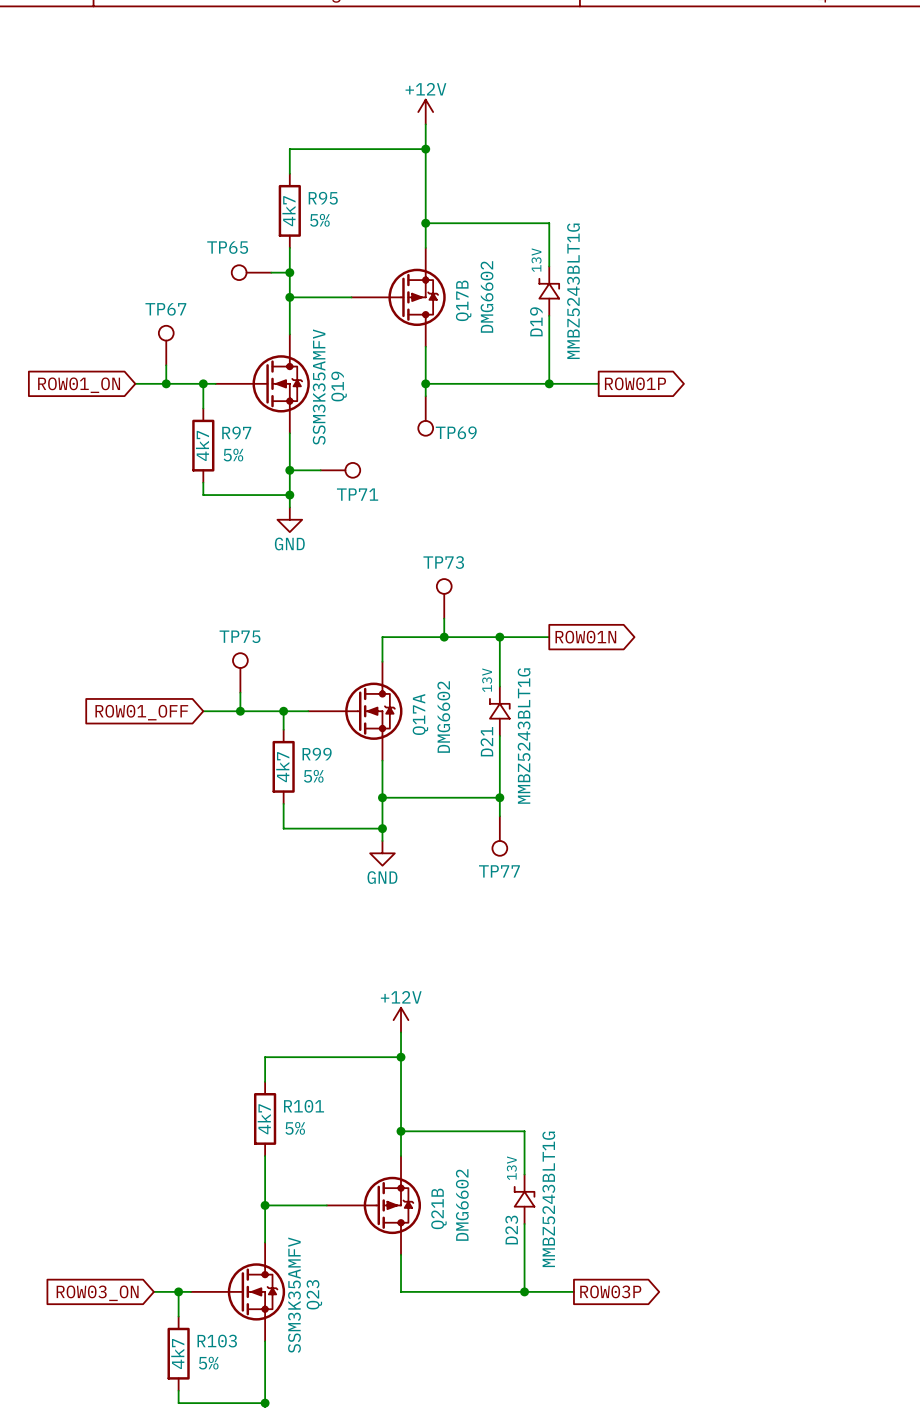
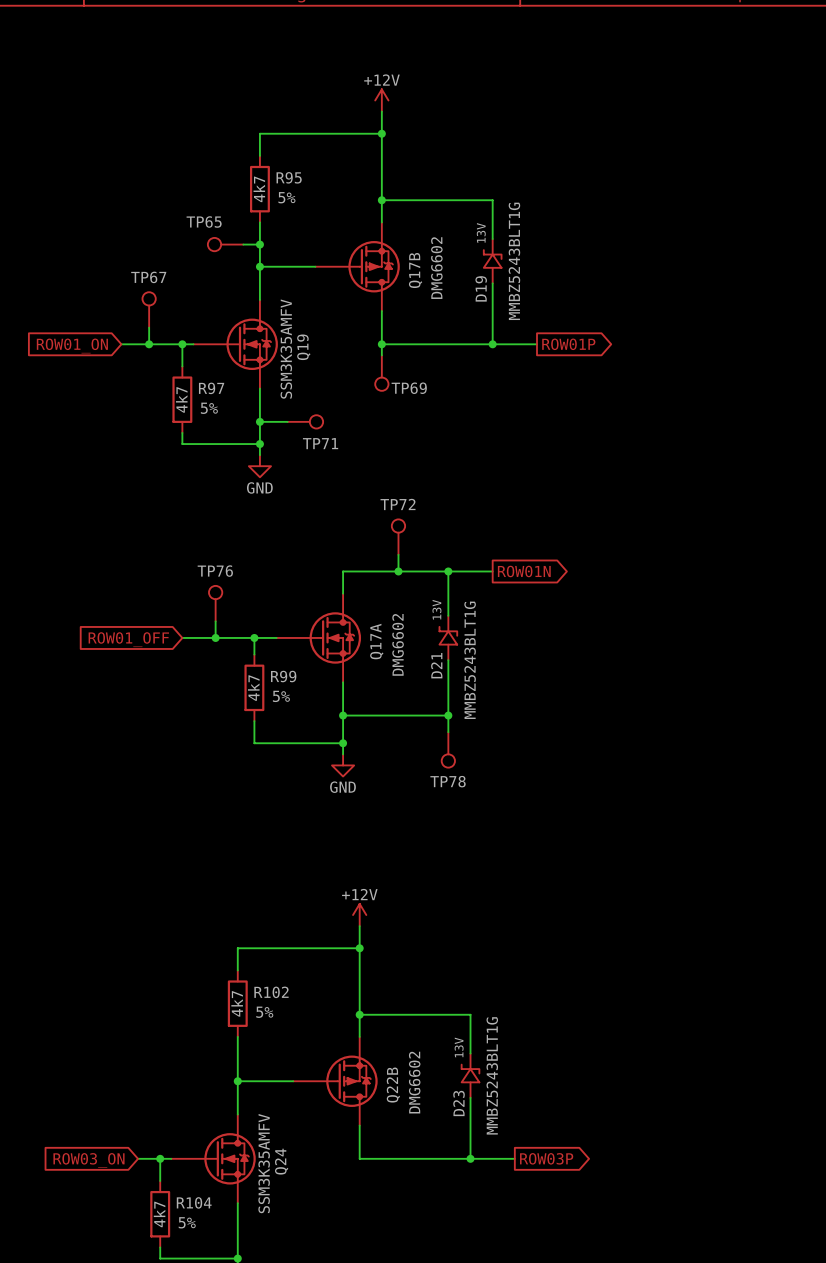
TP73 name: TP73 (443, 562) -> TP72 (398, 504)
TP75 name: TP75 (240, 636) -> TP76 (215, 571)
TP77 name: TP77 (499, 871) -> TP78 (448, 781)
R101 name: R101 (304, 1106) -> R102 (271, 992)
Q21B name: Q21B (438, 1208) -> Q22B (393, 1085)
Q23 name: Q23 (314, 1294) -> Q24 (281, 1161)
R103 name: R103 (217, 1341) -> R104 (194, 1202)

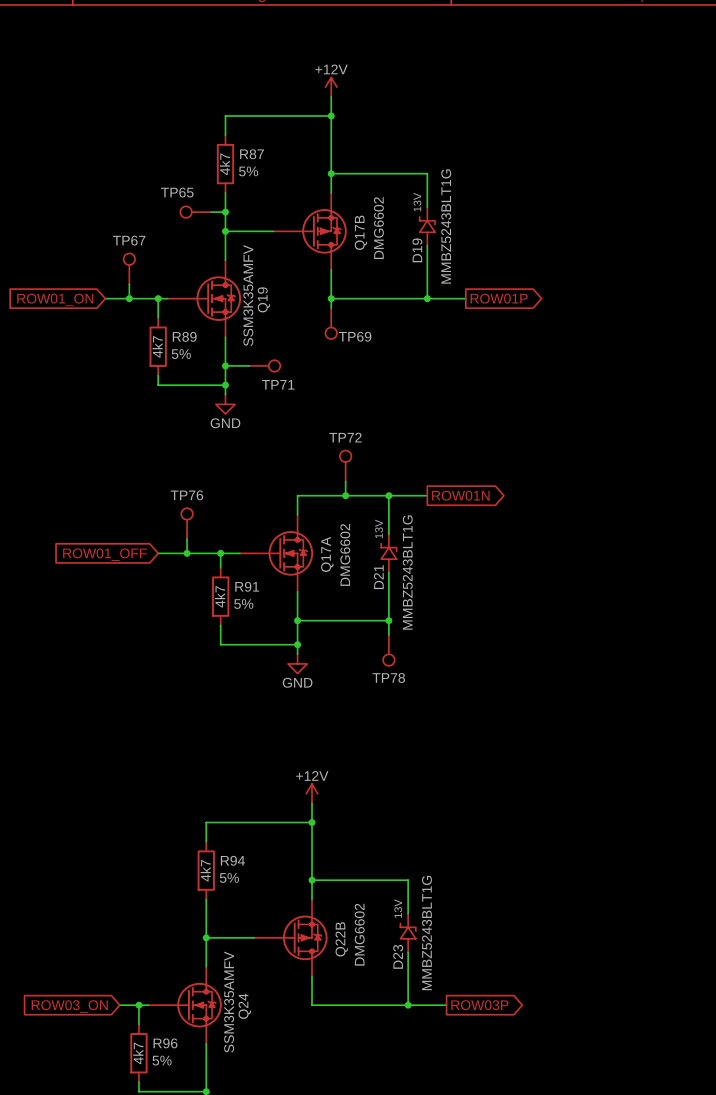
R95 name: R95 (289, 177) -> R87 (251, 154)
R97 name: R97 (211, 388) -> R89 (184, 336)
R99 name: R99 (283, 676) -> R91 (247, 586)
R102 name: R102 (271, 992) -> R94 (232, 860)
R104 name: R104 (194, 1202) -> R96 (165, 1043)

